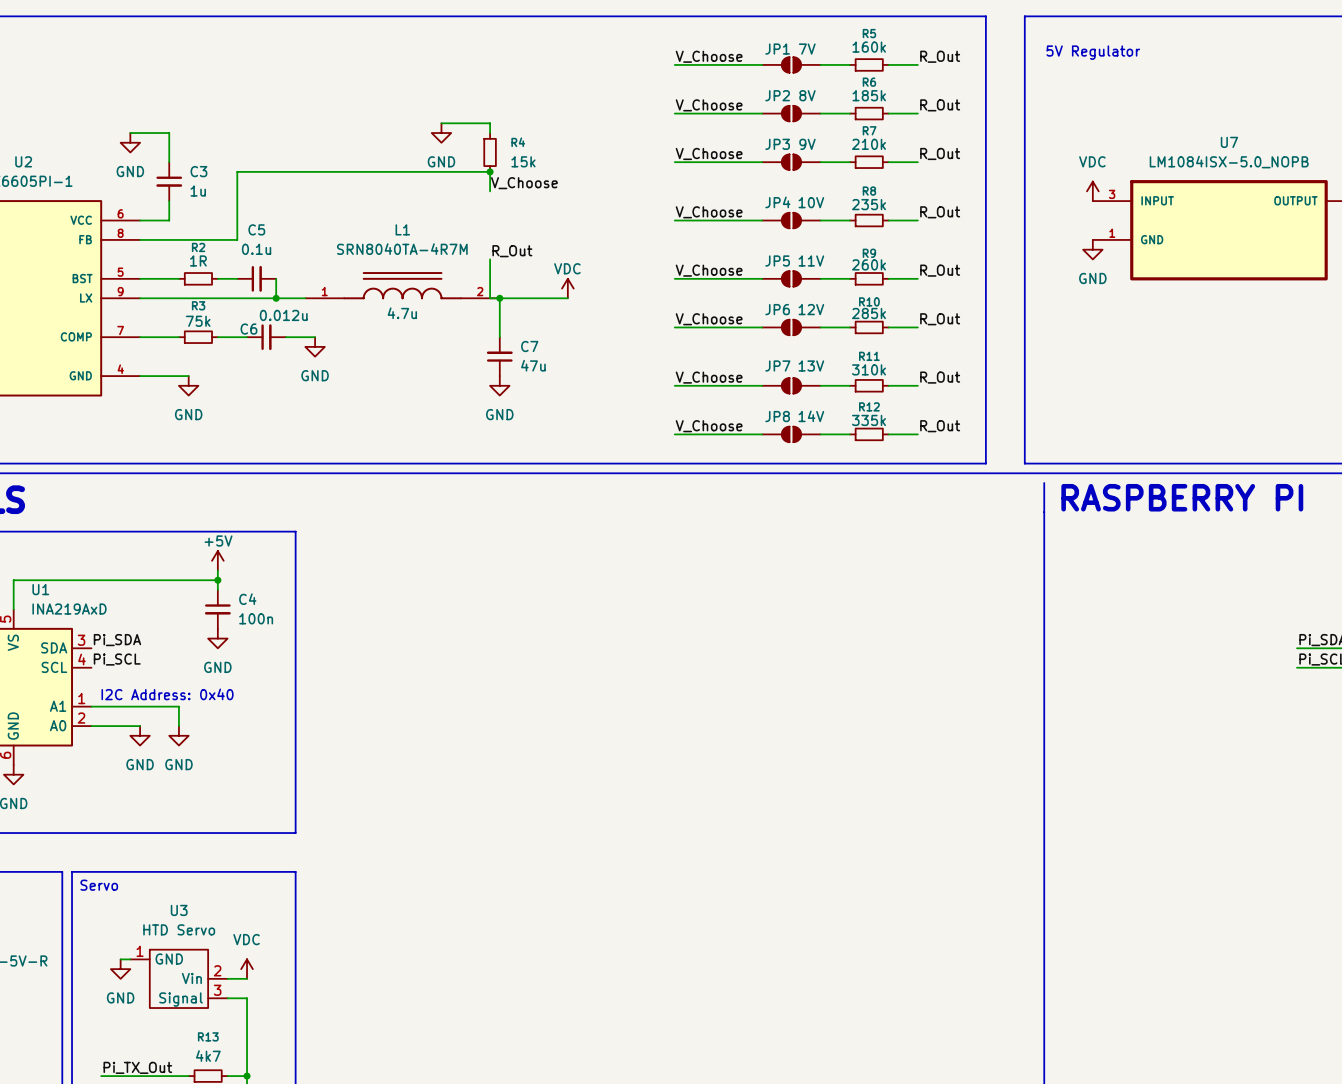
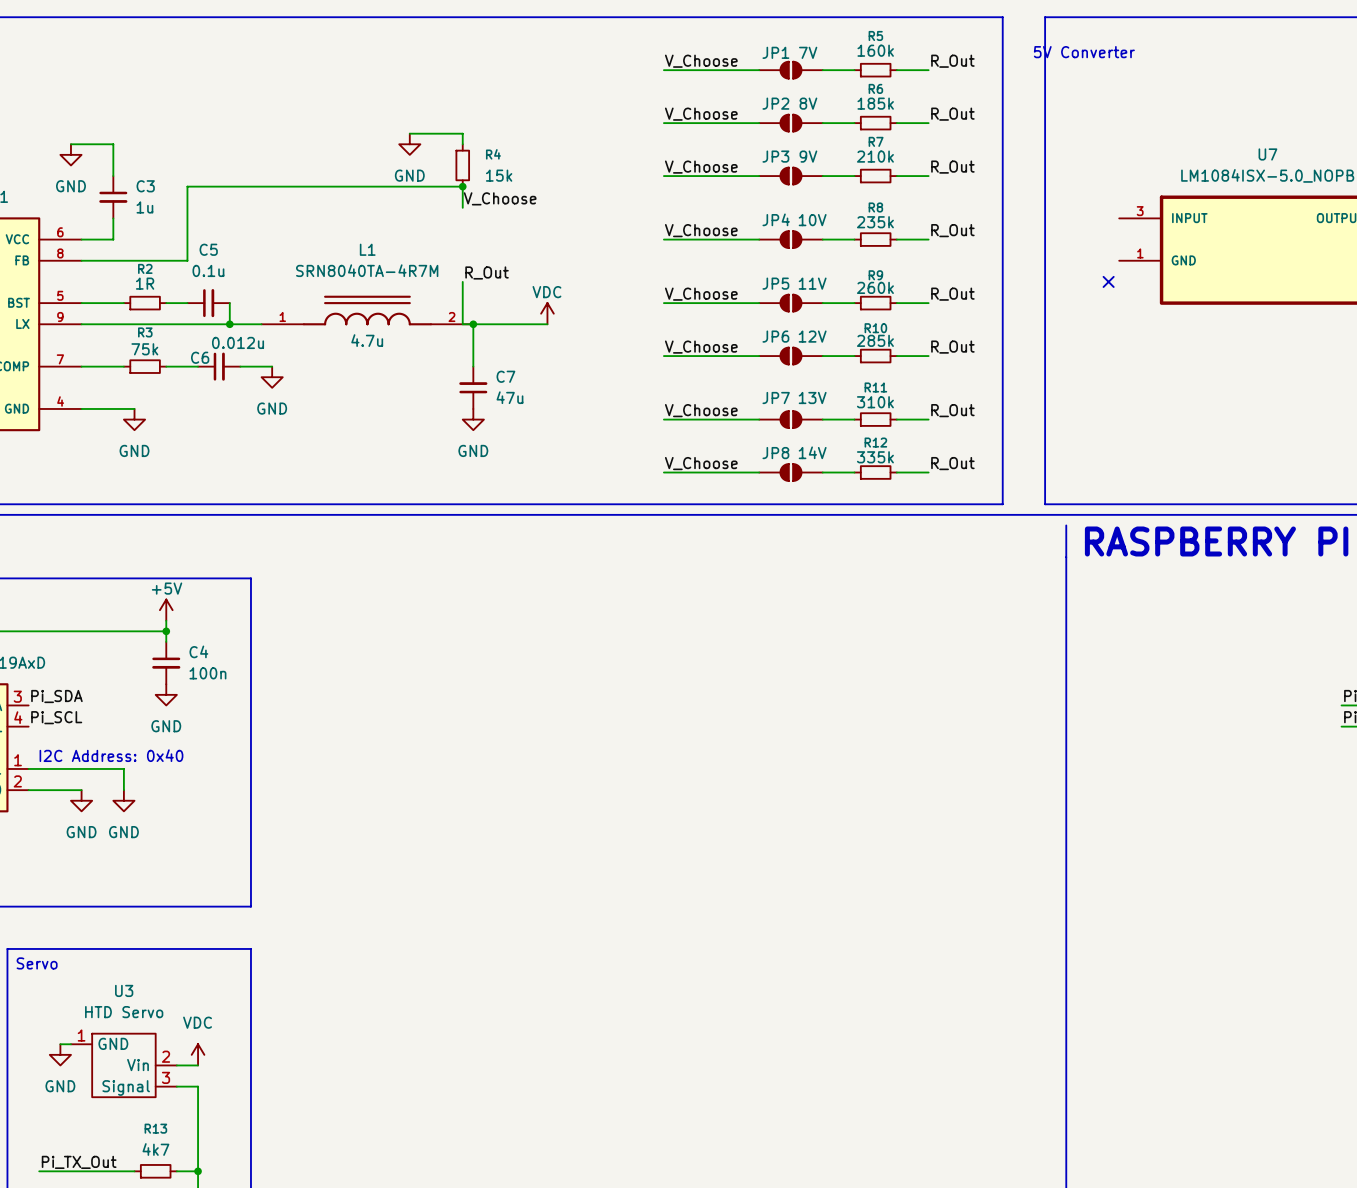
text: none -> 5V Converter (1084, 52)
text: 5V Regulator (1093, 52) -> none
power symbol: VDC (1092, 191) -> none
power symbol: GND (1092, 249) -> none
no-connect mark: none -> (1108, 281)

